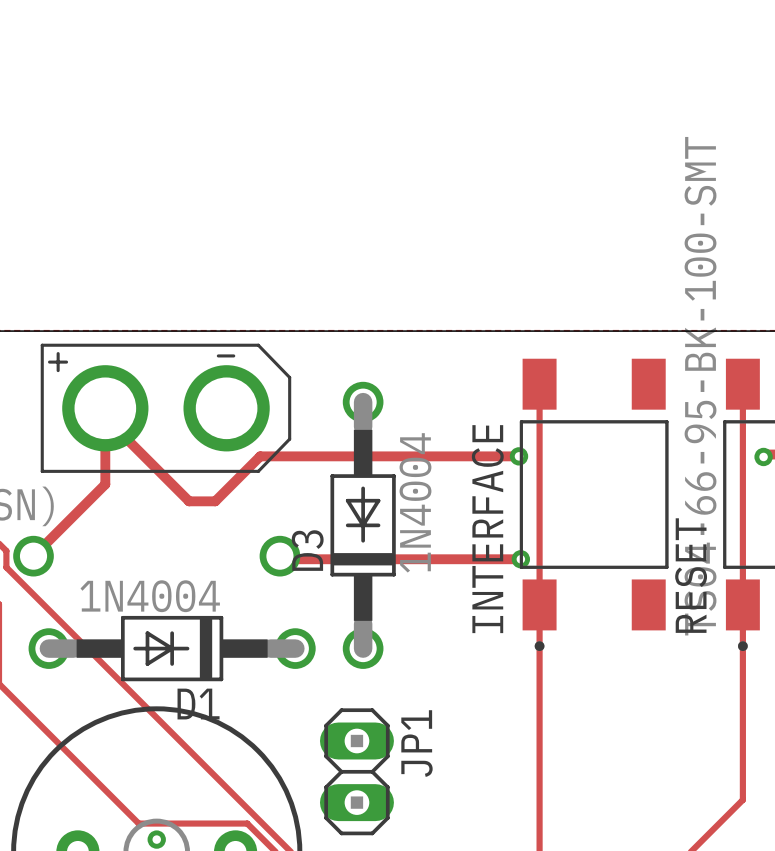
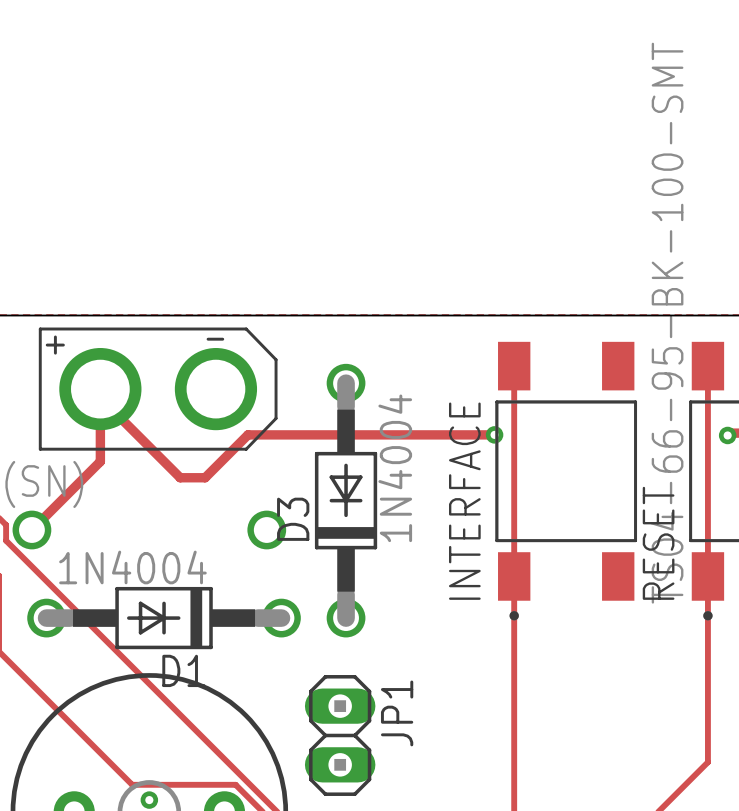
track: (279, 556) (283, 559) (520, 559) -> none
via: (520, 559) -> none

